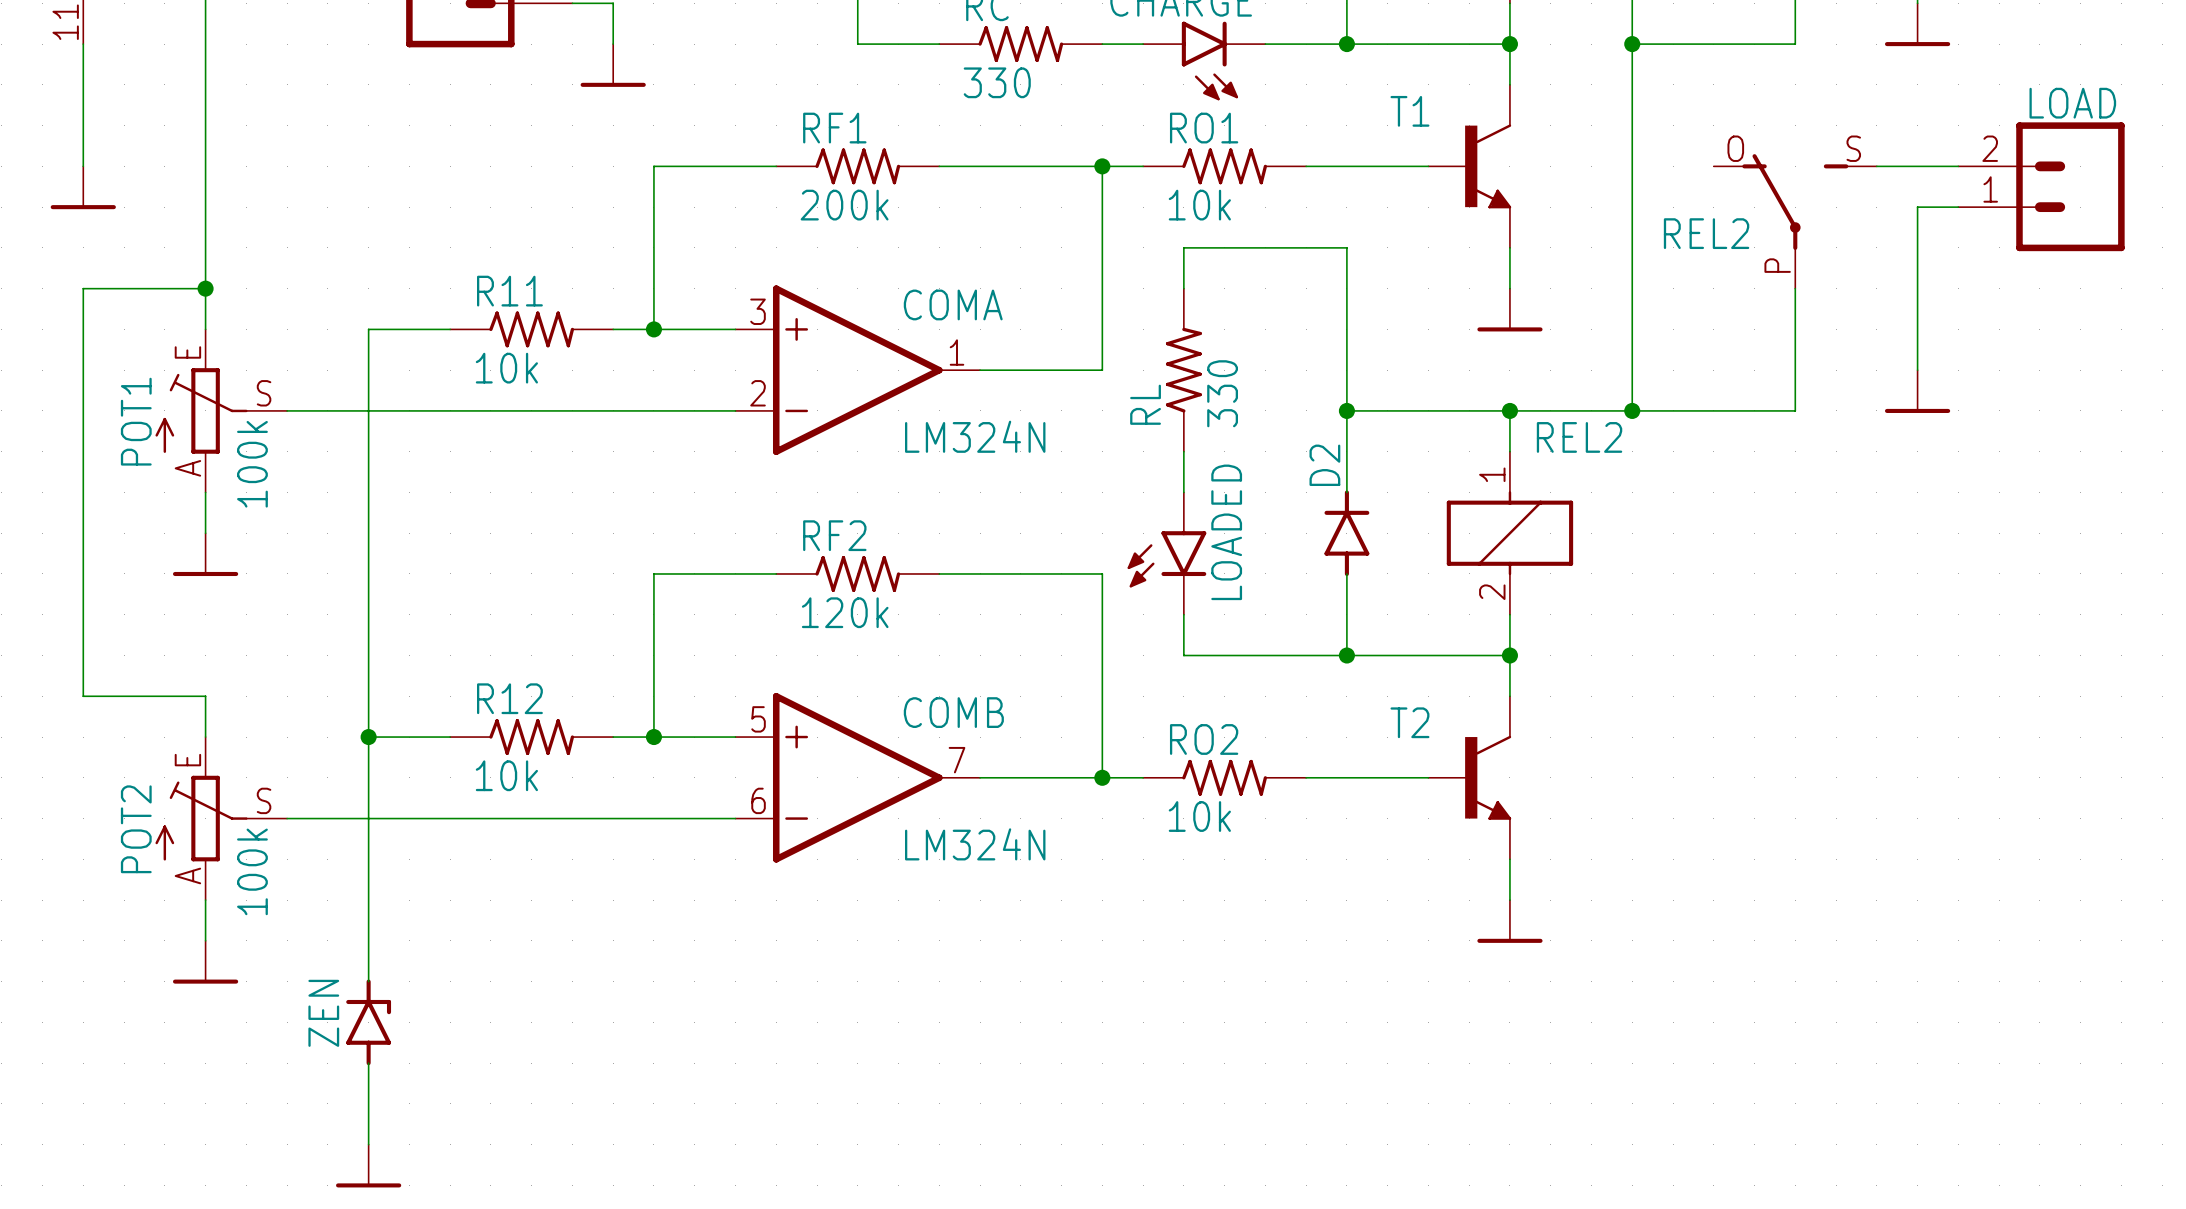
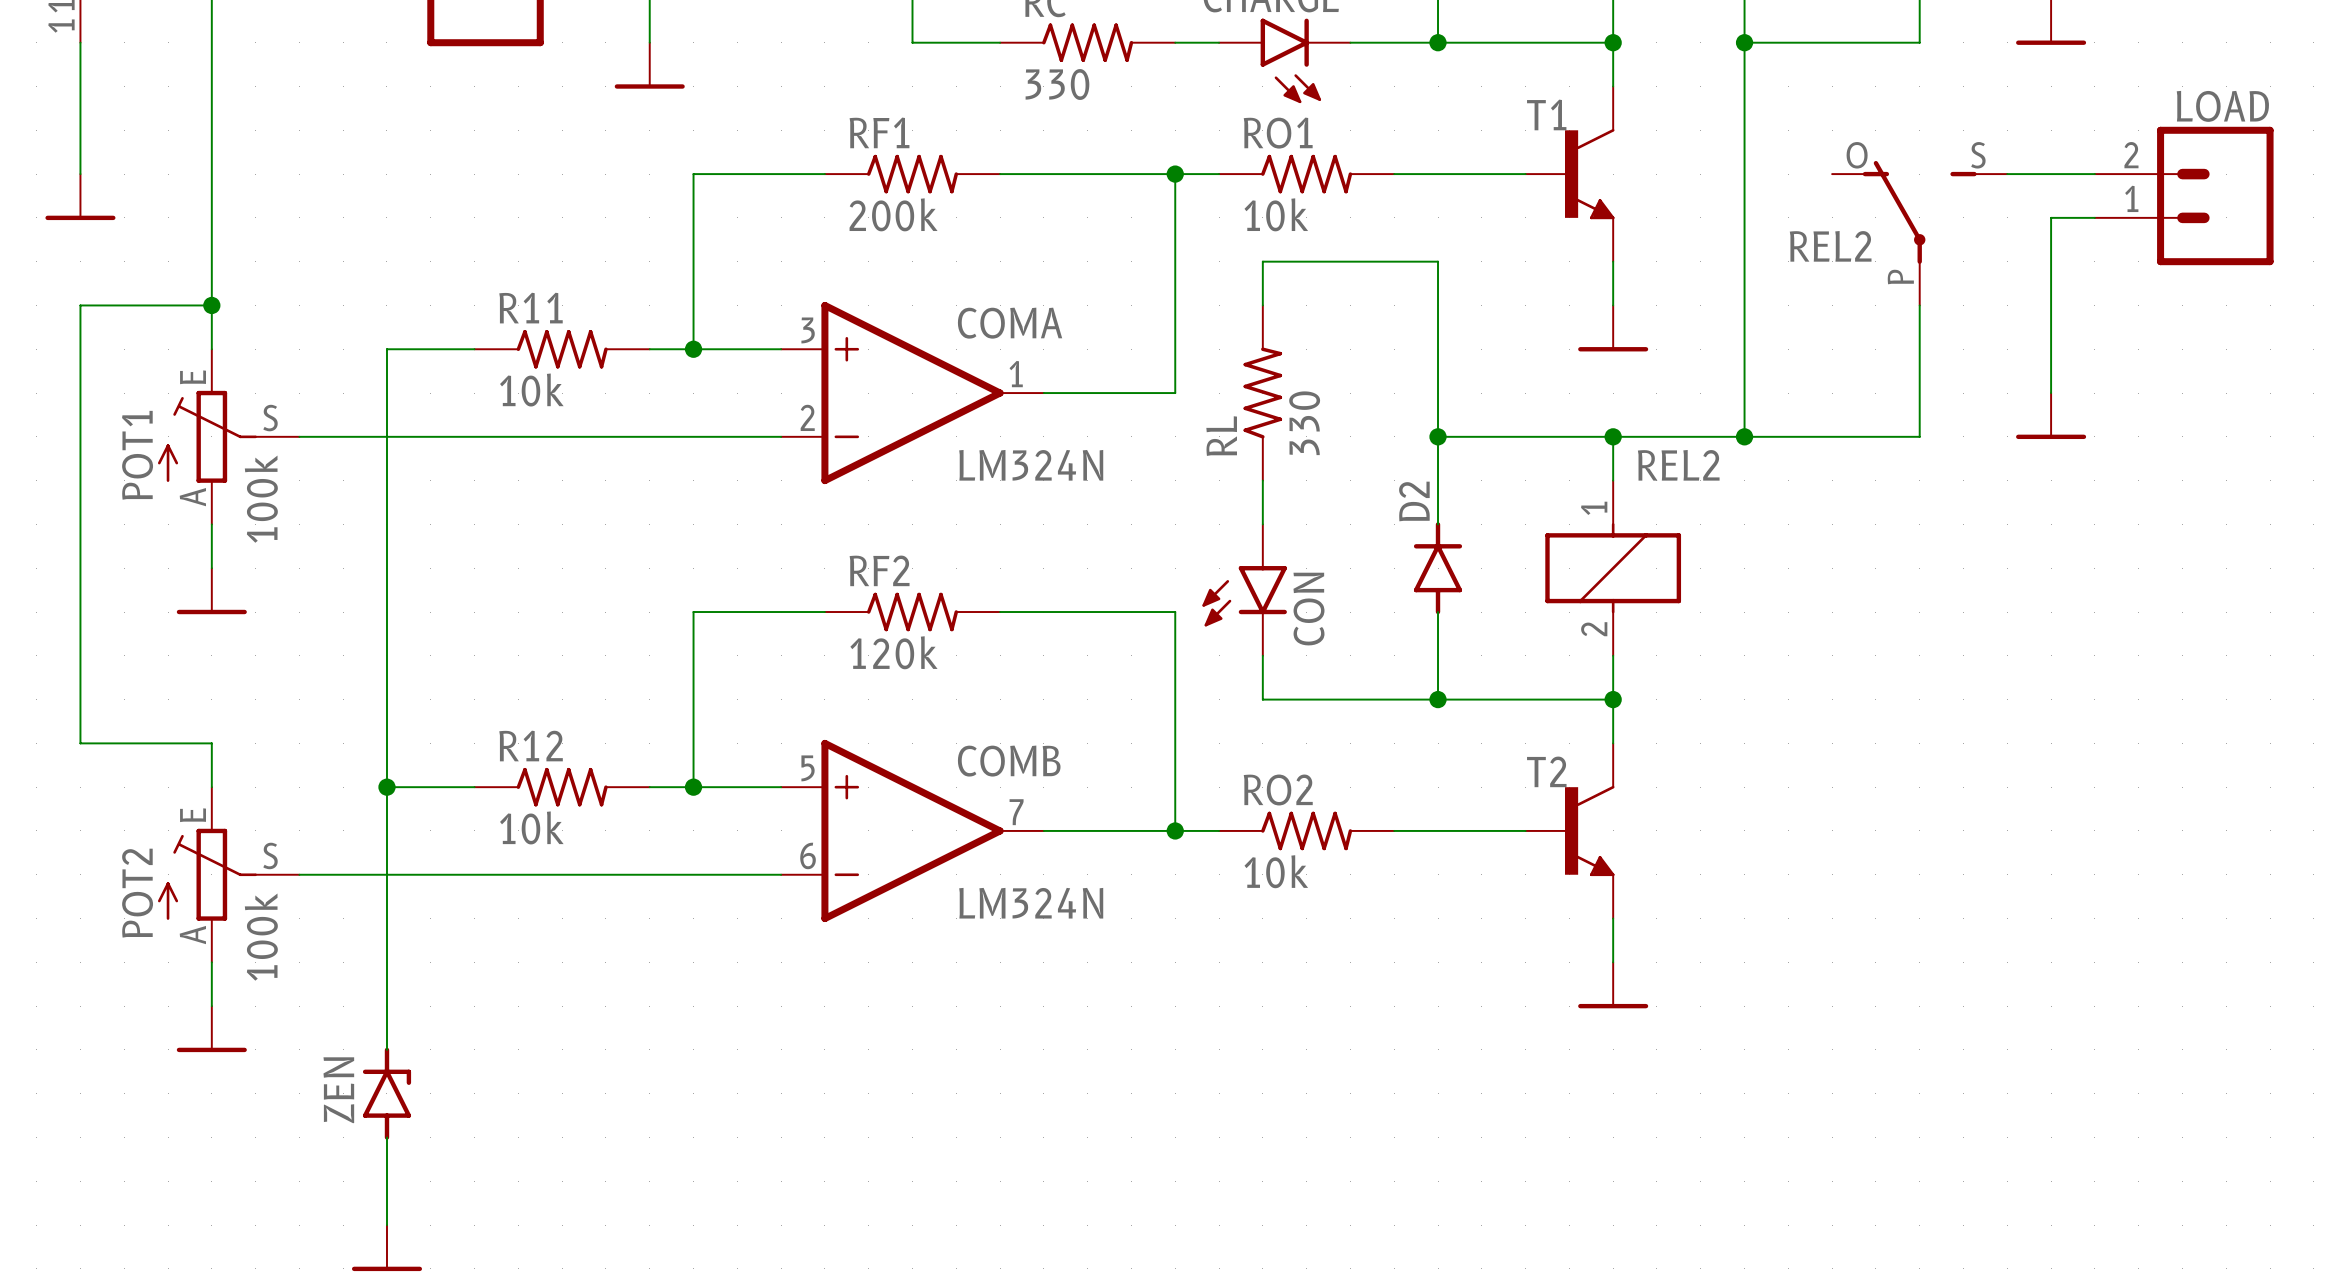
T1 name position: T1 (1409, 111) -> T1 (1546, 114)
LOADED name: LOADED (1226, 532) -> CON (1308, 609)
T2 name position: T2 (1409, 722) -> T2 (1546, 771)

